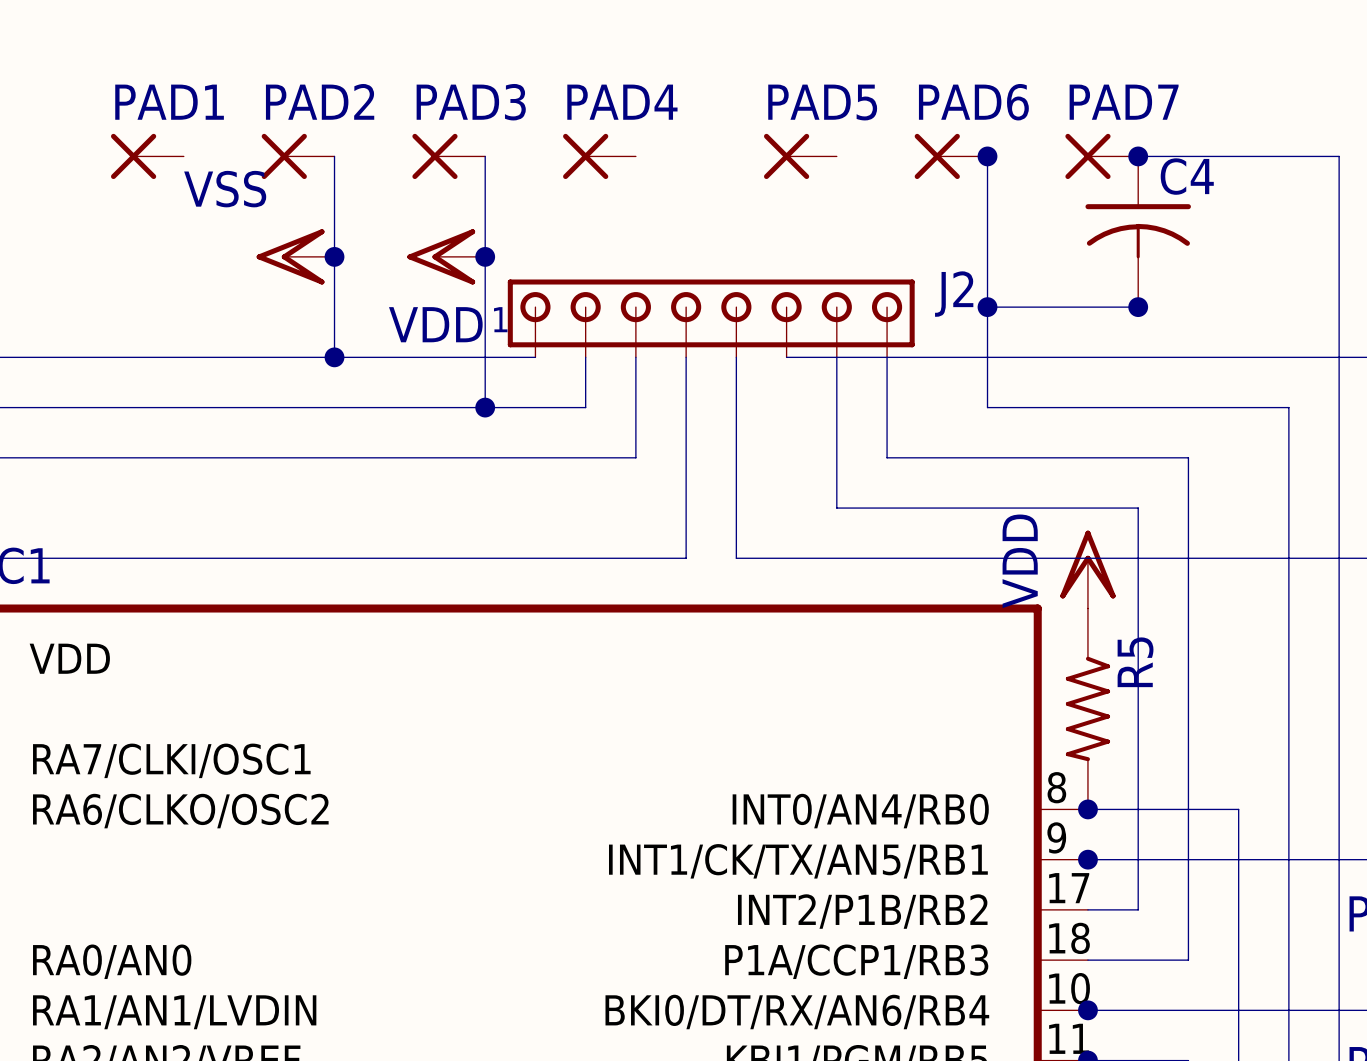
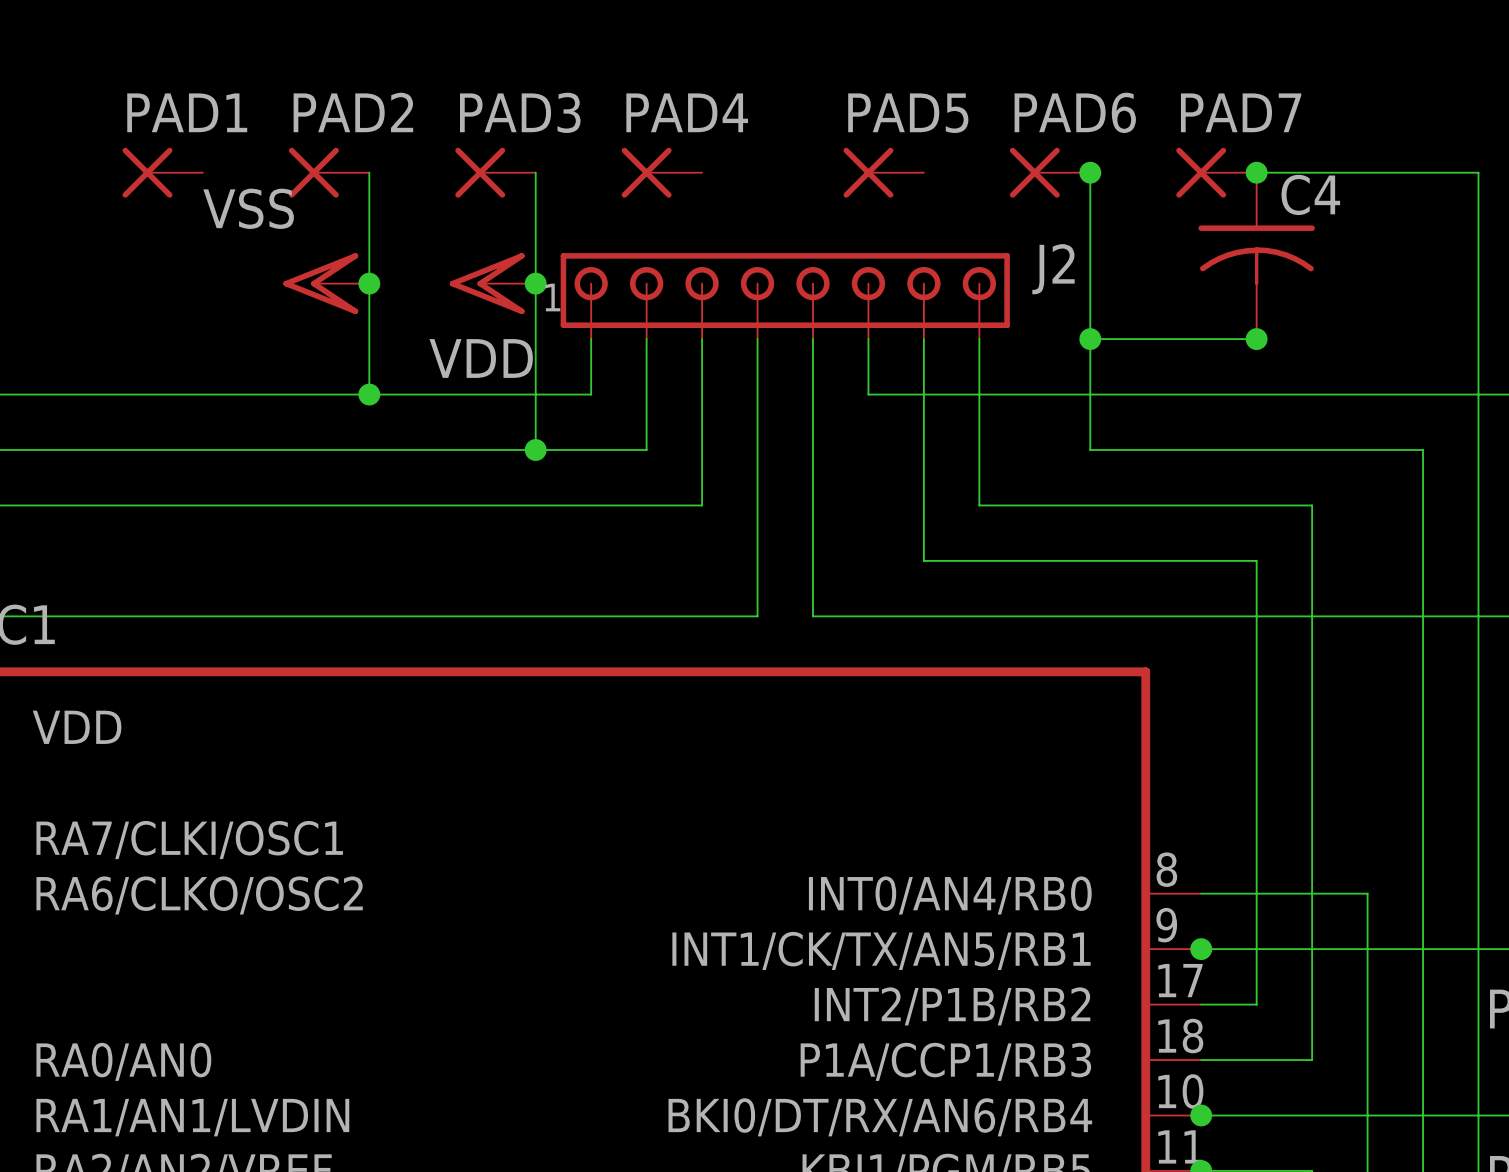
J2 position: (711, 318) -> (785, 296)
power symbol: VDD (1087, 569) -> none
R5: (1087, 708) -> none
junction: (1087, 809) -> none

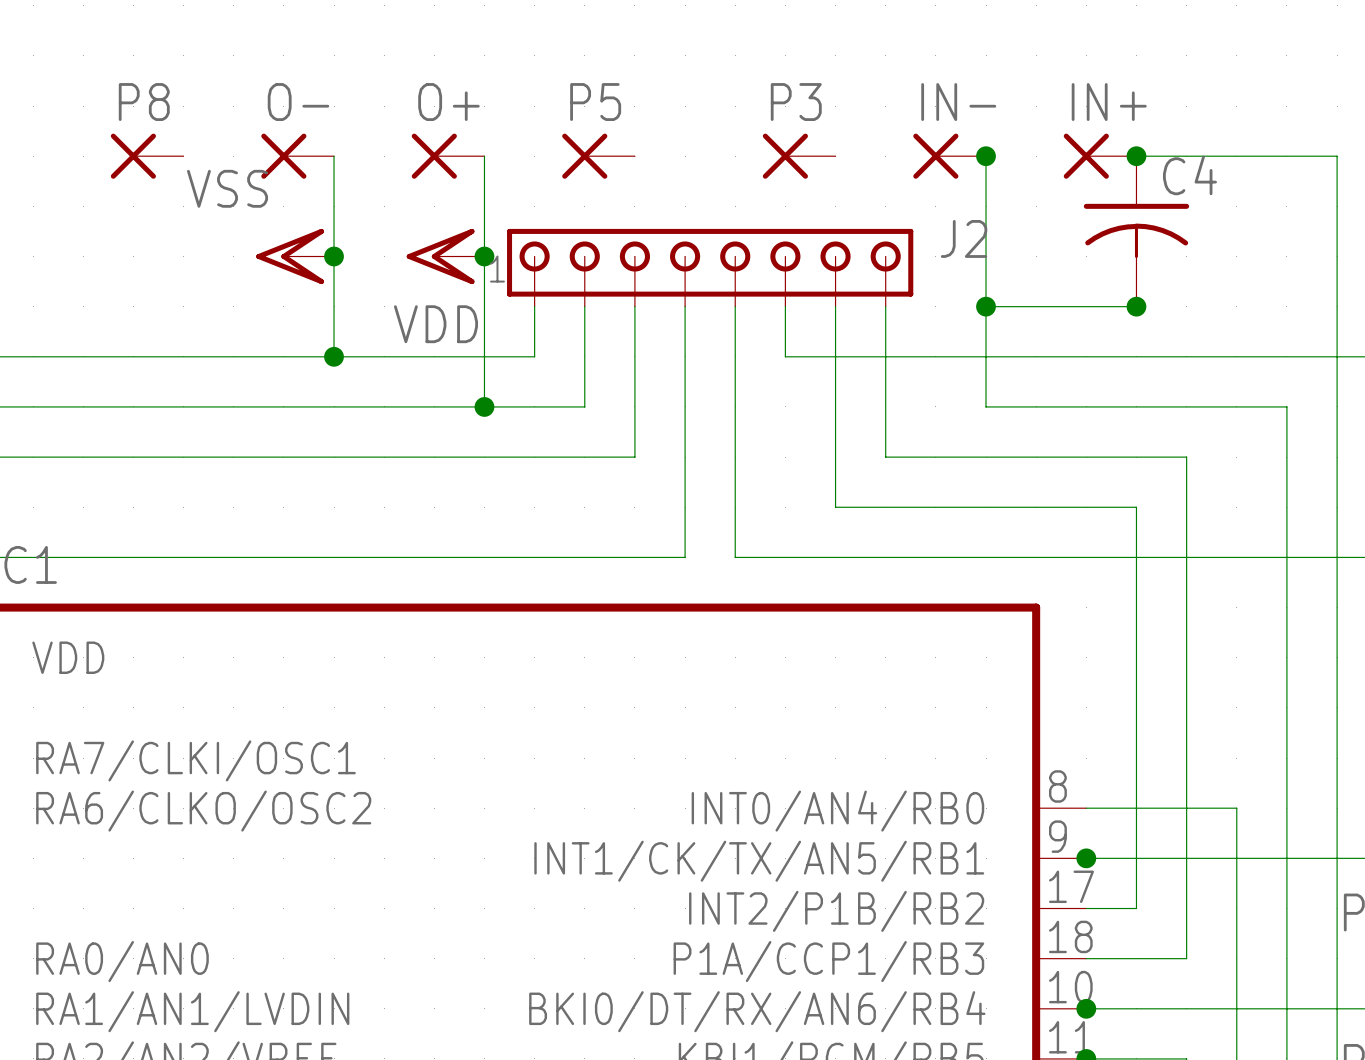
PAD1 name: PAD1 (187, 112) -> P8 (144, 102)
PAD2 name: PAD2 (353, 112) -> O- (298, 102)
PAD3 name: PAD3 (520, 112) -> O+ (448, 102)
PAD4 name: PAD4 (687, 112) -> P5 (595, 102)
PAD6 name: PAD6 (1075, 112) -> IN- (958, 102)
PAD7 name: PAD7 (1241, 112) -> IN+ (1109, 102)
PAD5 name: PAD5 (908, 113) -> P3 (796, 102)

